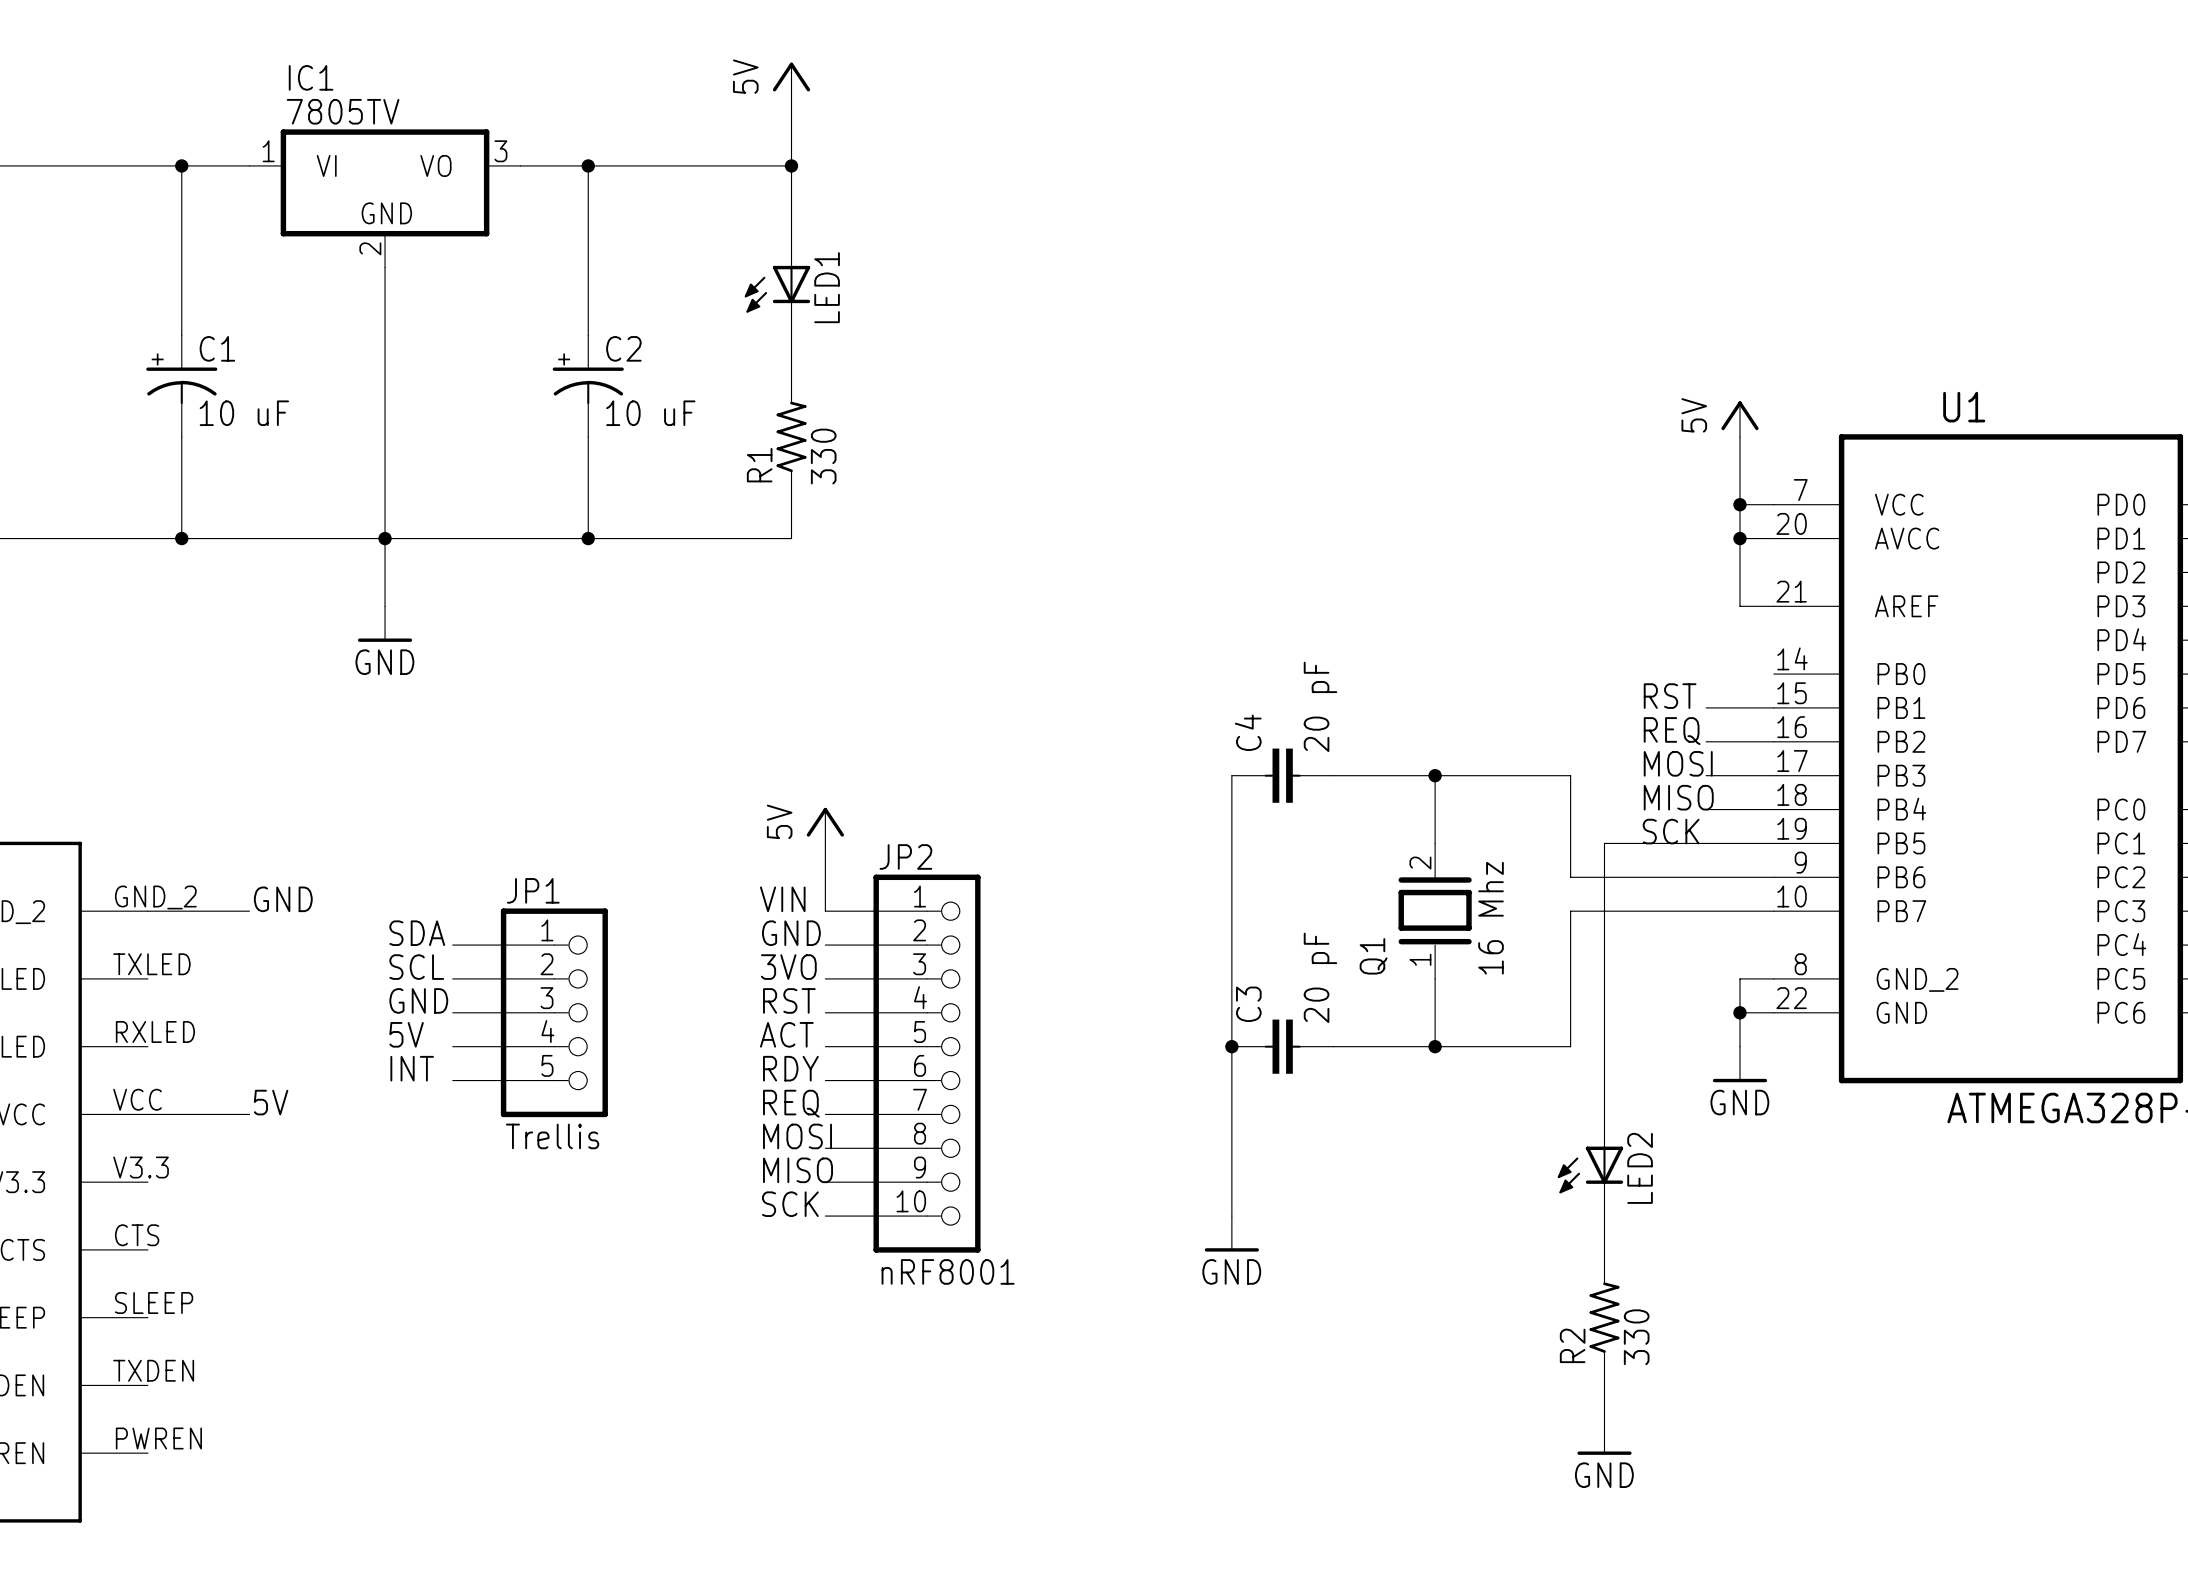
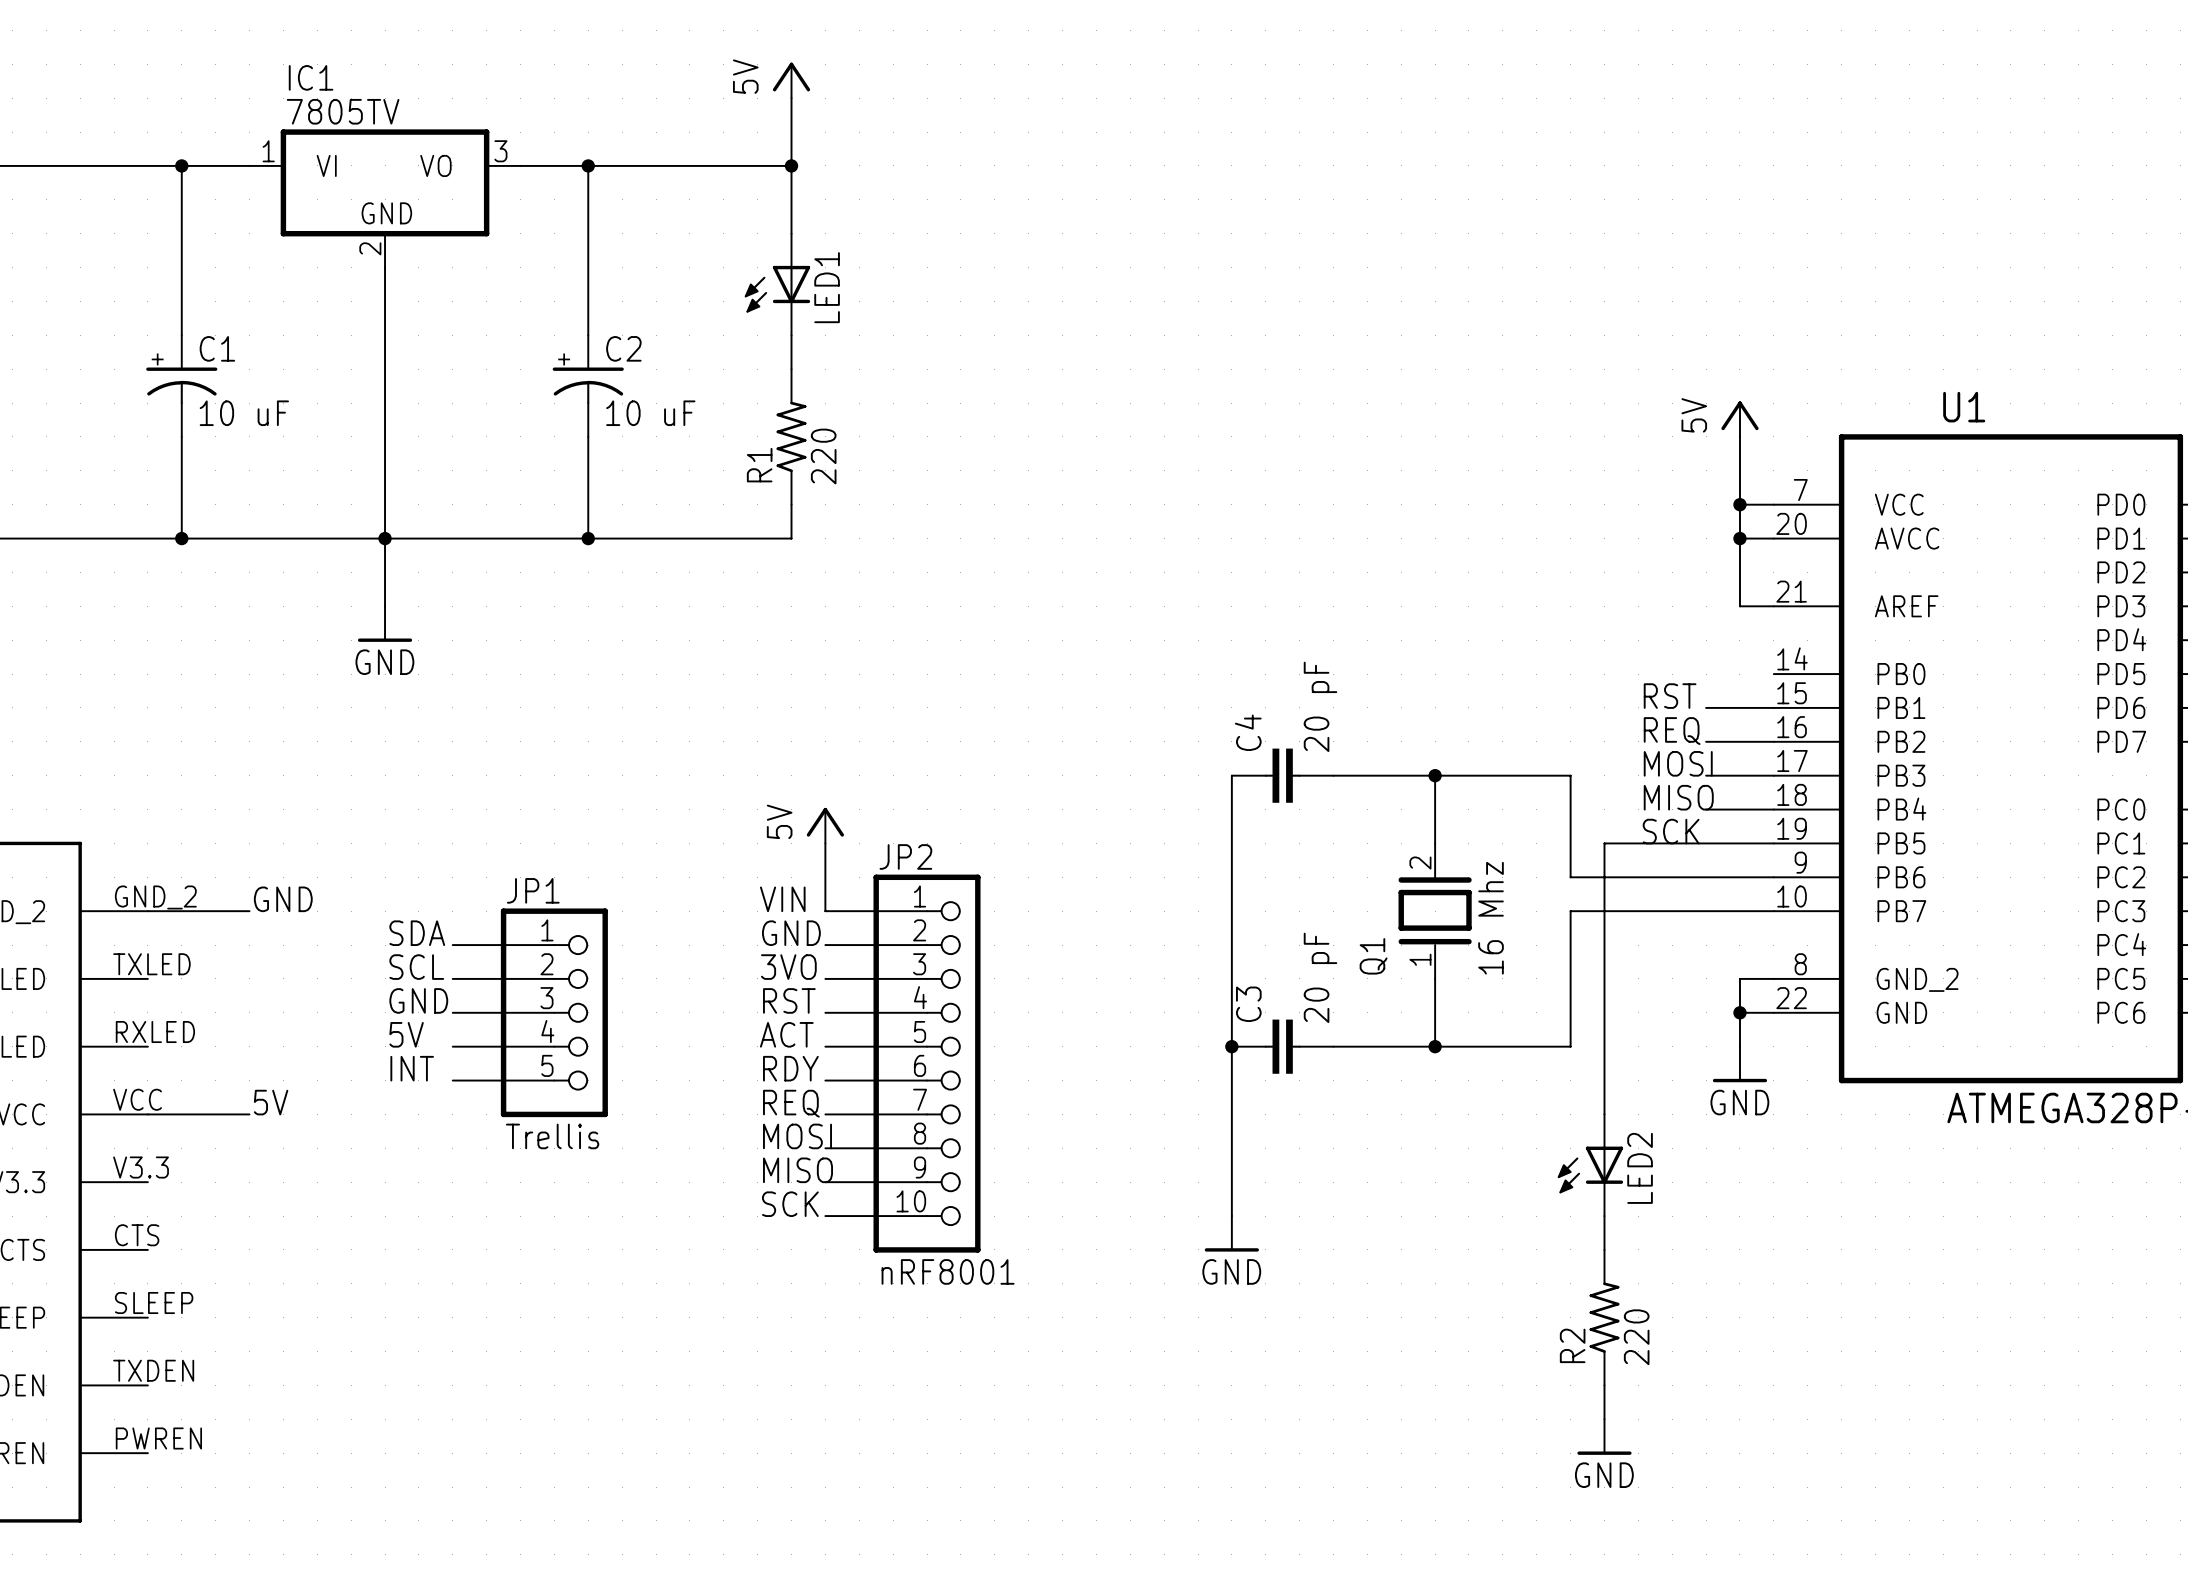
R1 value: 330 (823, 456) -> 220 (823, 456)
R2 value: 330 (1636, 1337) -> 220 (1636, 1337)

